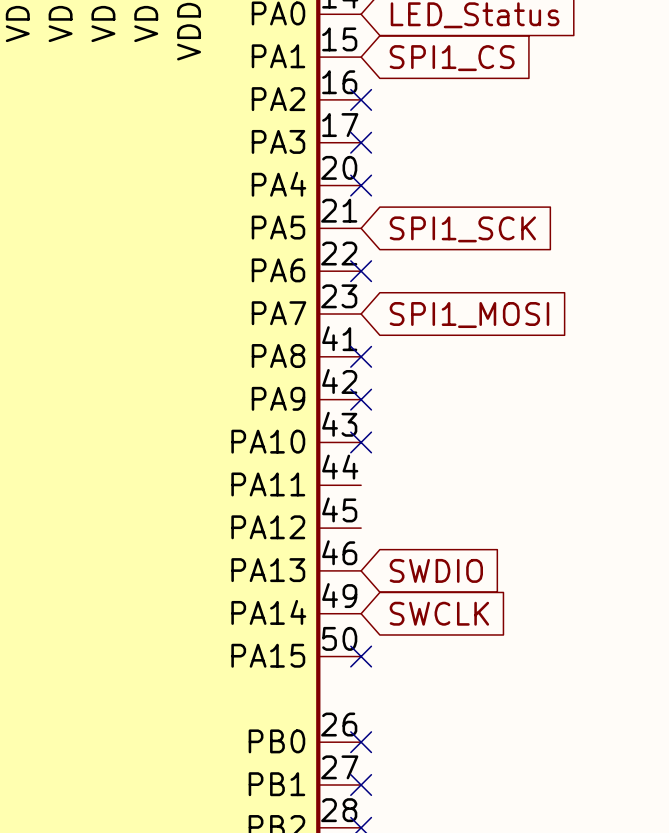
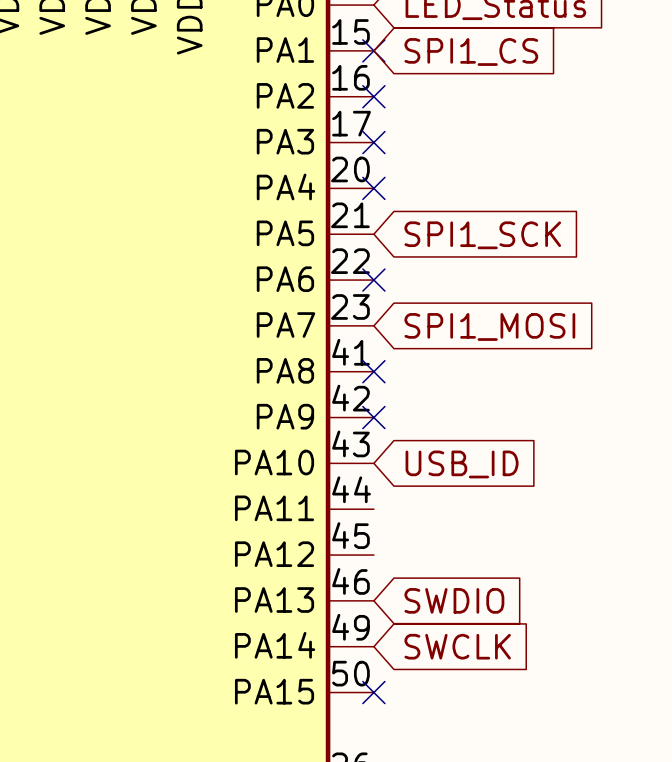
no-connect mark: none -> (373, 50)
no-connect mark: (361, 442) -> none
global label: none -> USB_ID (462, 464)

